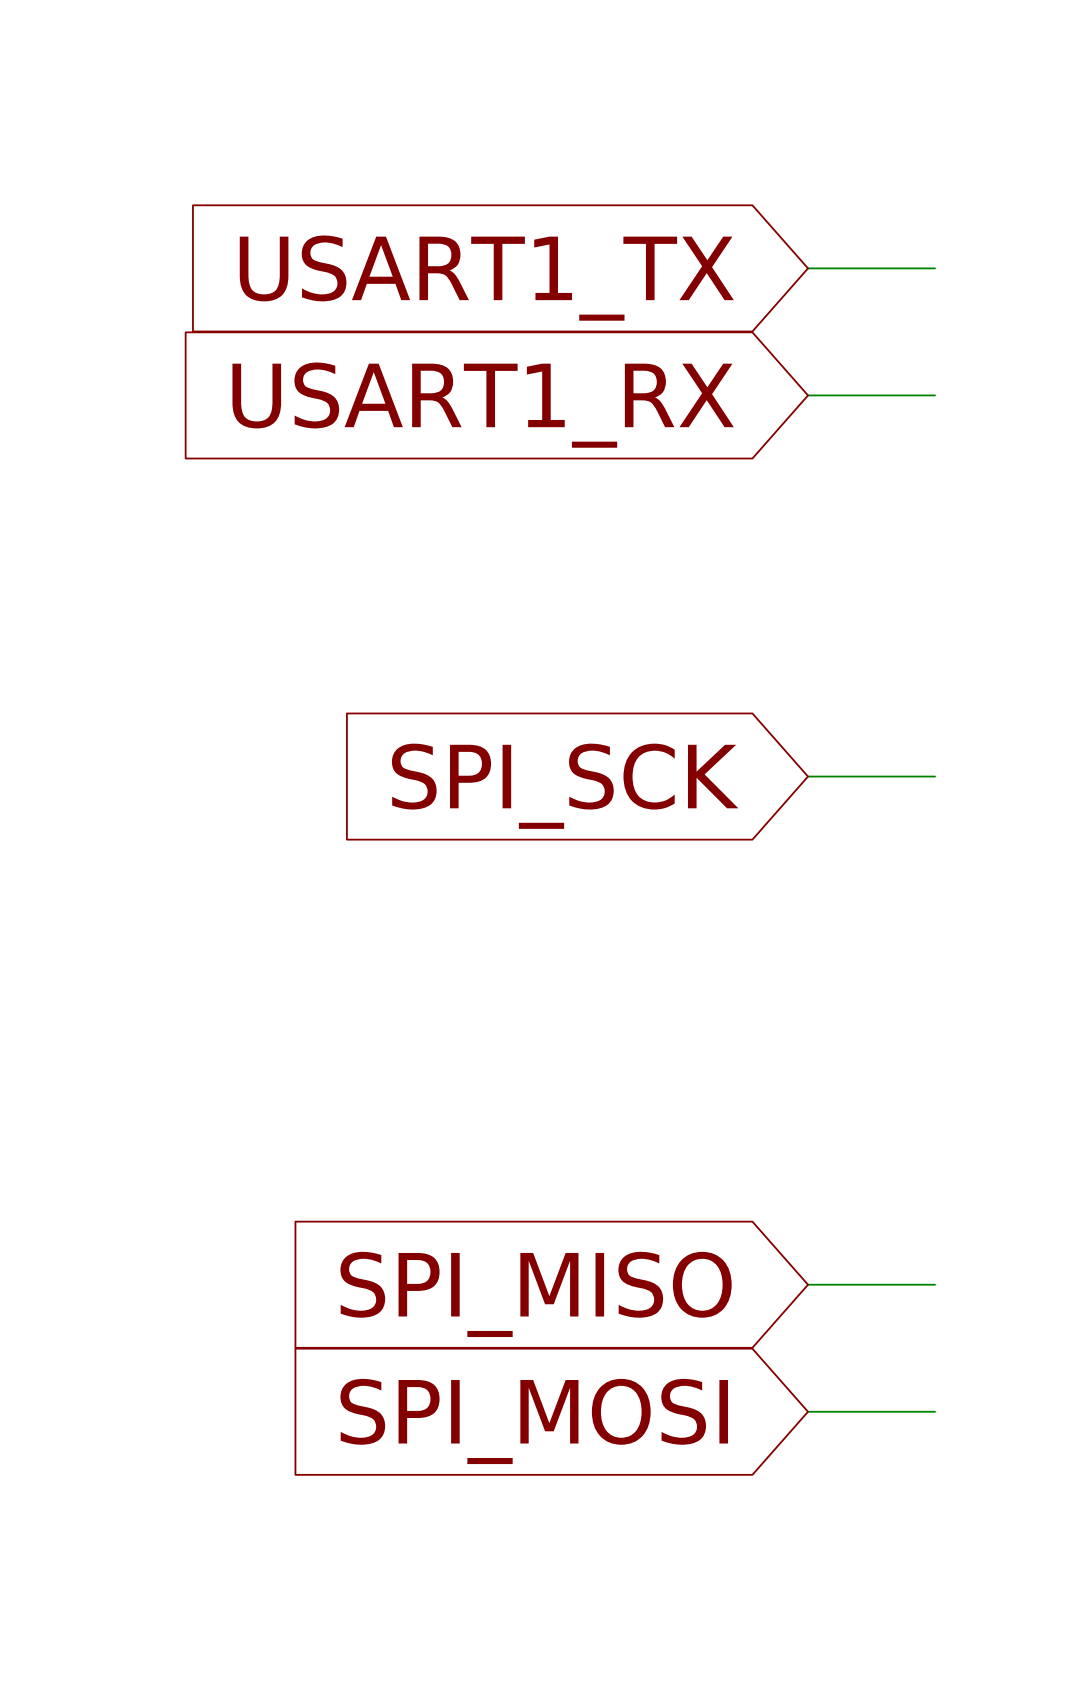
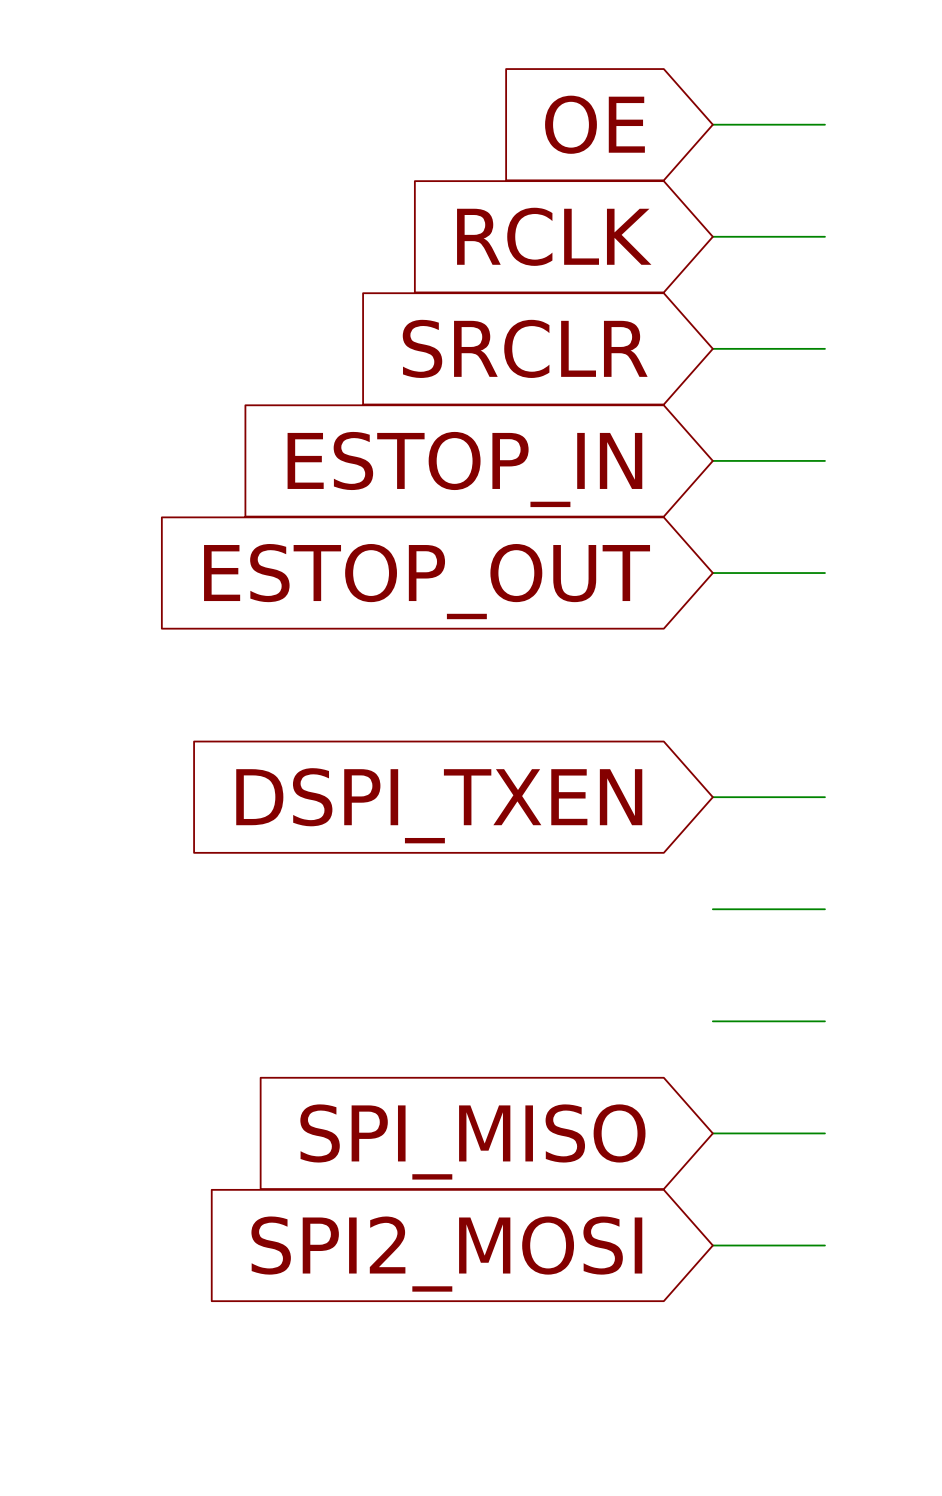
global label: none -> OE (594, 124)
wire: none -> (712, 124) (824, 124)
global label: USART1_TX (486, 278) -> RCLK (554, 236)
global label: USART1_RX (483, 405) -> SRCLR (525, 348)
wire: none -> (712, 460) (824, 460)
global label: none -> ESTOP_IN (464, 469)
wire: none -> (712, 573) (824, 573)
global label: none -> ESTOP_OUT (427, 581)
wire: (808, 776) (935, 776) -> (712, 797) (824, 797)
global label: SPI_SCK (565, 786) -> none
global label: none -> DSPI_TXEN (439, 805)
wire: none -> (712, 909) (824, 909)
wire: none -> (712, 1021) (824, 1021)
global label: SPI_MOSI (534, 1421) -> SPI2_MOSI (446, 1254)

